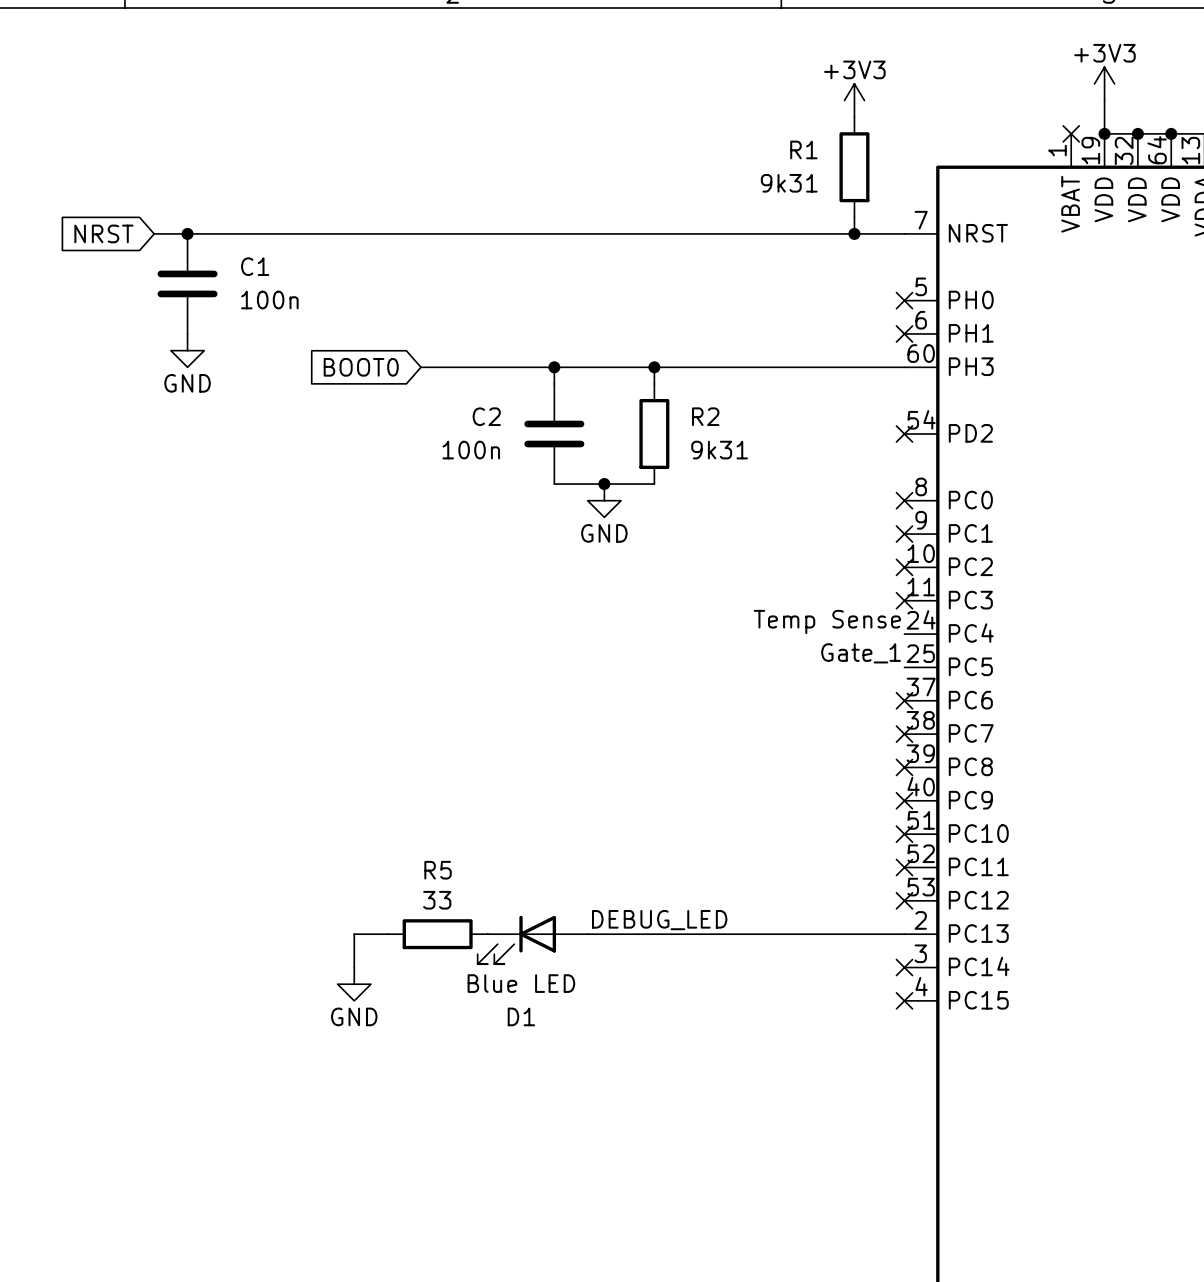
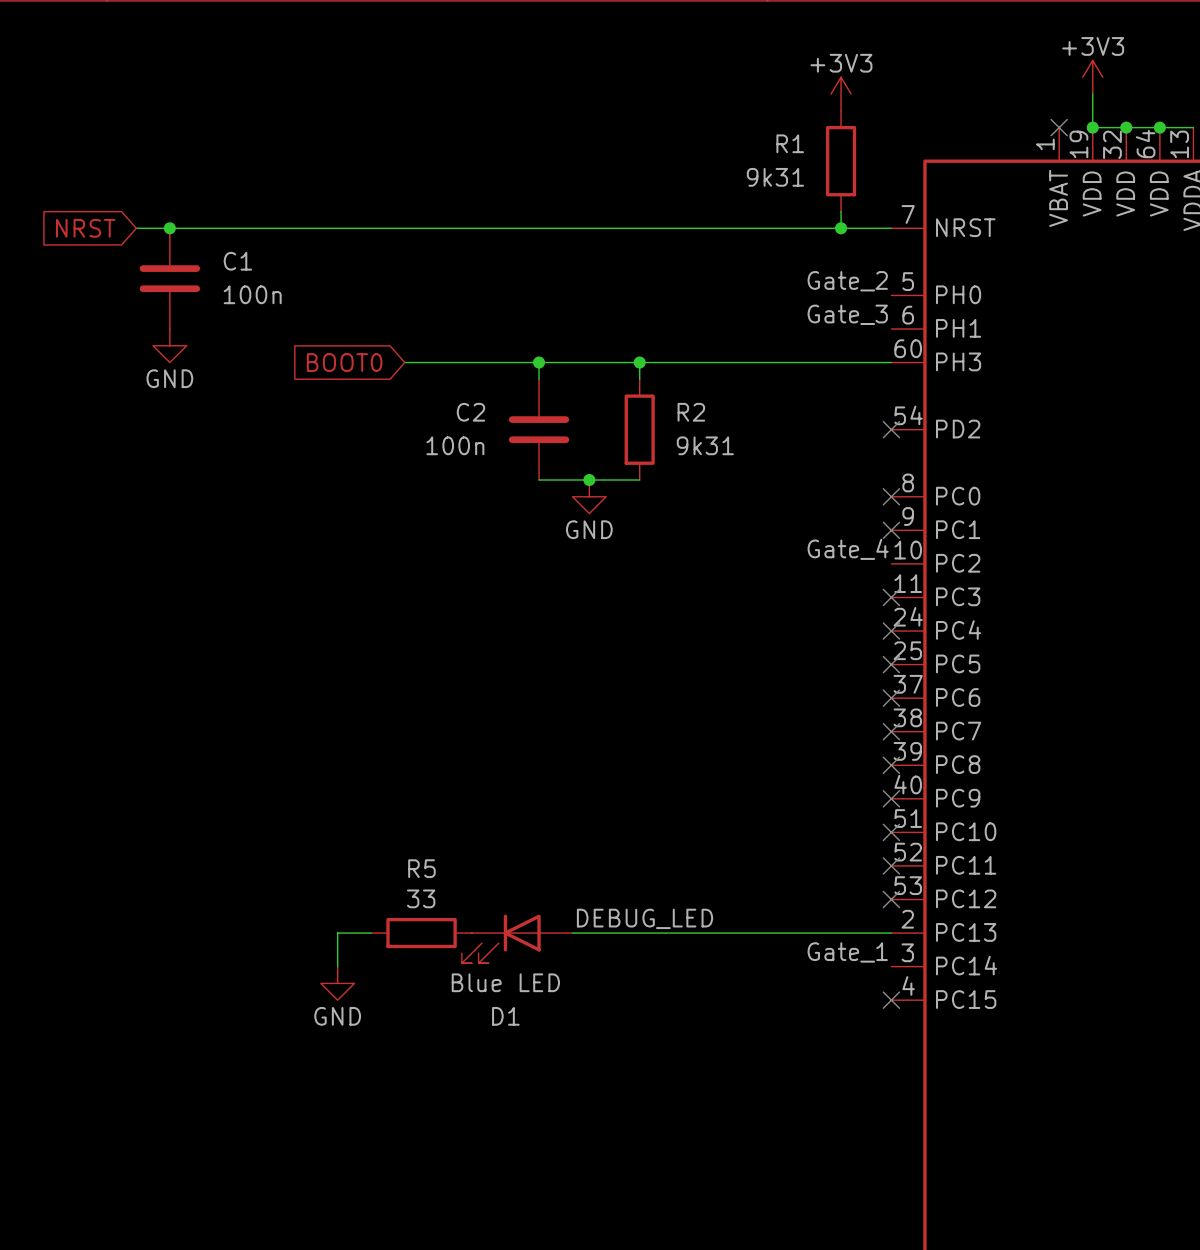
label: none -> Gate_2 (847, 281)
no-connect mark: (904, 300) -> none
label: none -> Gate_3 (847, 314)
no-connect mark: (904, 333) -> none
label: none -> Gate_4 (848, 549)
no-connect mark: (904, 567) -> none
label: Temp Sense (827, 621) -> none
no-connect mark: none -> (891, 631)
label position: Gate_1 (861, 653) -> Gate_1 (847, 952)
no-connect mark: none -> (891, 664)
no-connect mark: (904, 967) -> none

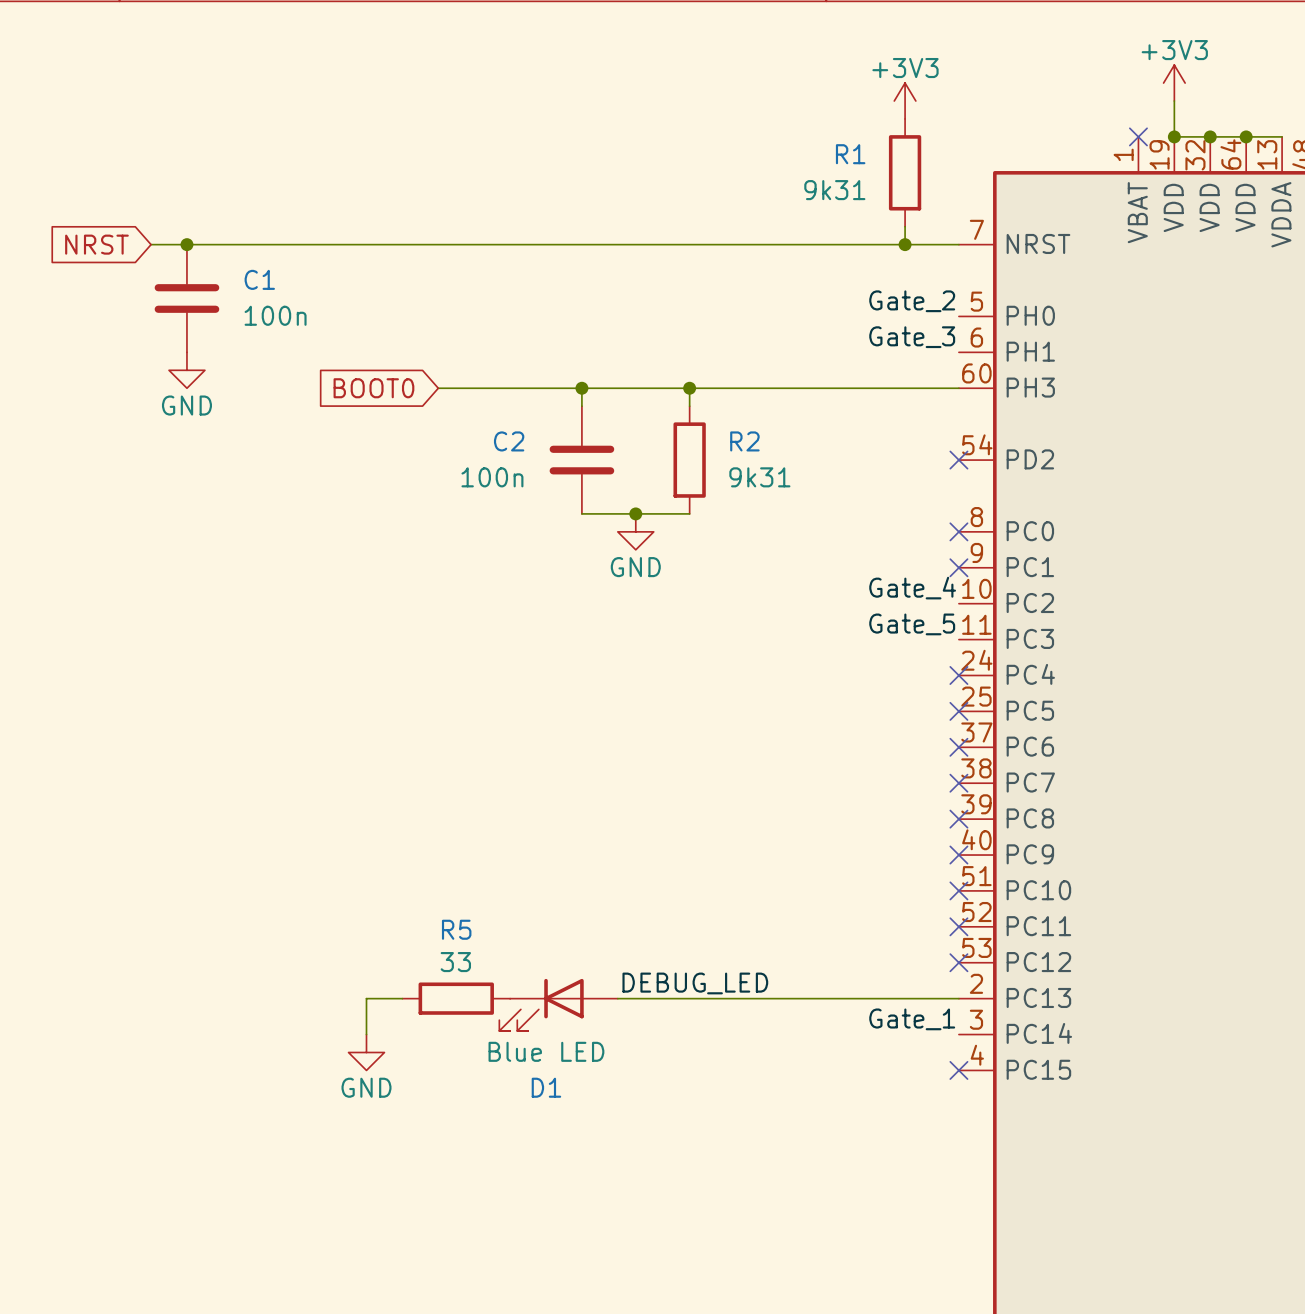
label: none -> Gate_5 (912, 624)
no-connect mark: (891, 597) -> none

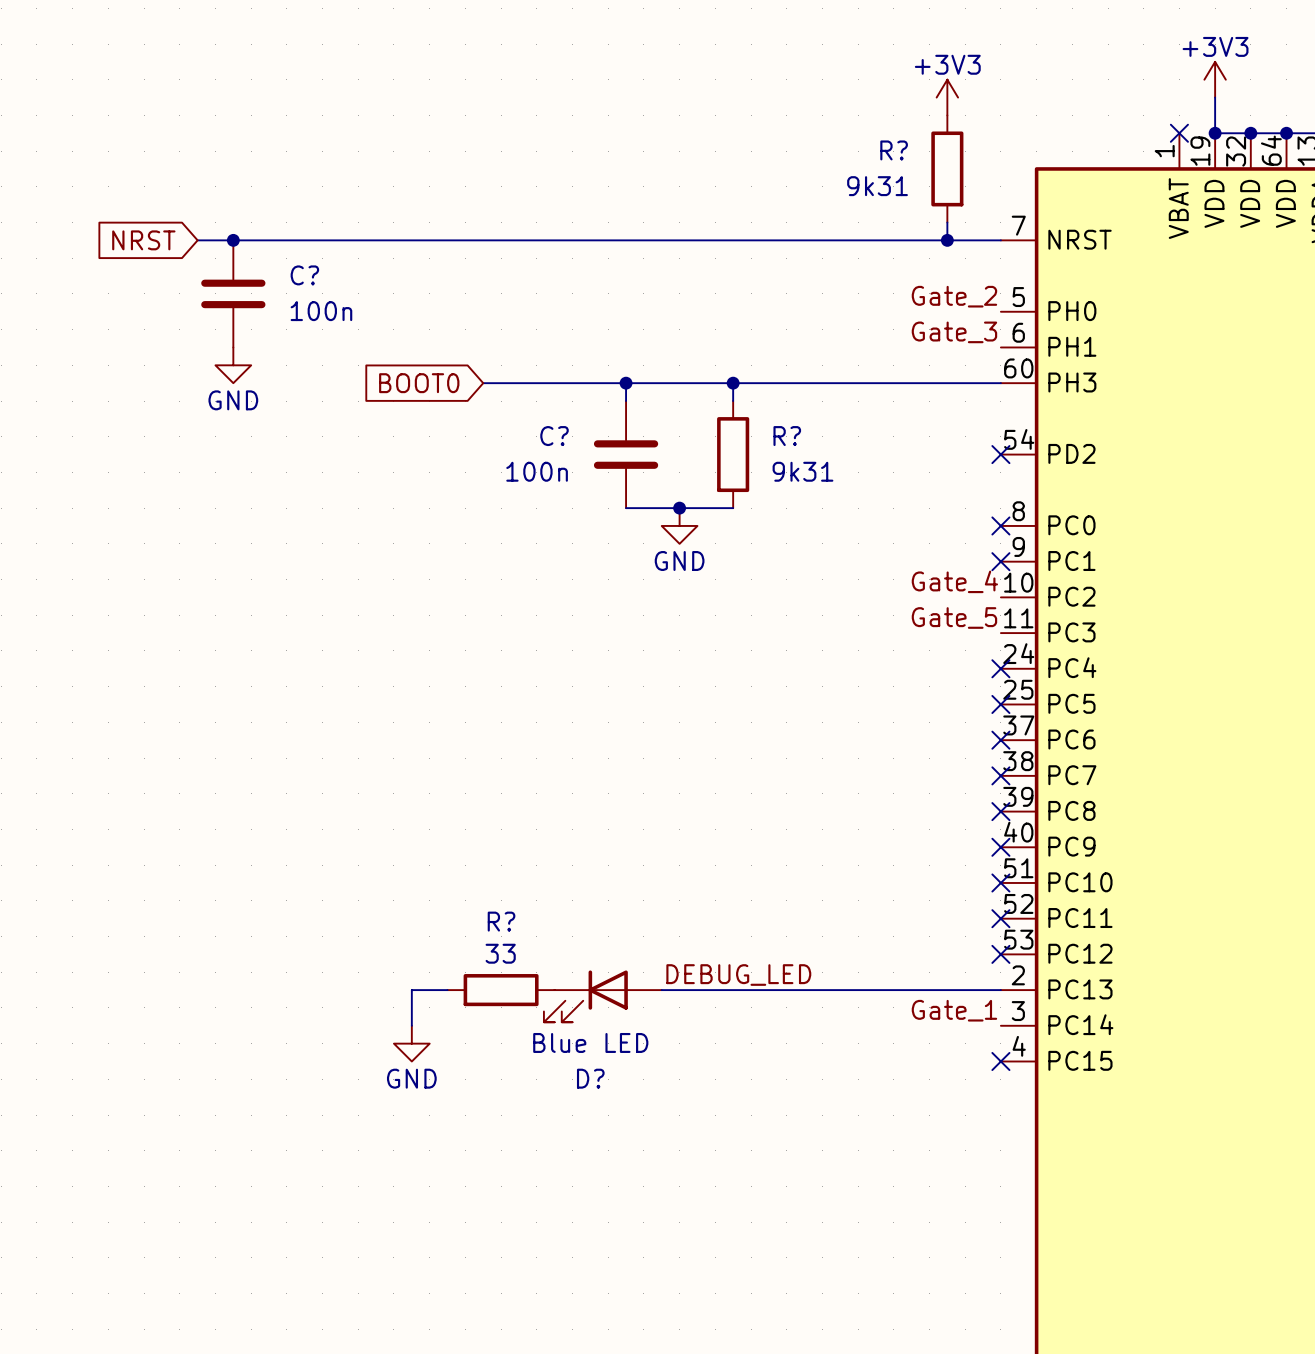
R1 name: R1 (850, 154) -> R? (894, 150)
C1 name: C1 (259, 279) -> C? (304, 275)
C2 name: C2 (509, 441) -> C? (554, 436)
R2 name: R2 (744, 441) -> R? (787, 436)
R5 name: R5 (456, 929) -> R? (501, 921)
D1 name: D1 (546, 1087) -> D? (590, 1078)

